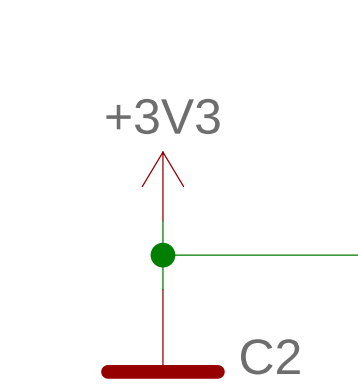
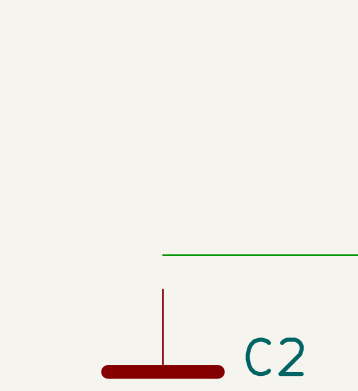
power symbol: +3V3 (162, 186) -> none
wire: (162, 220) (162, 289) -> none
junction: (162, 255) -> none

